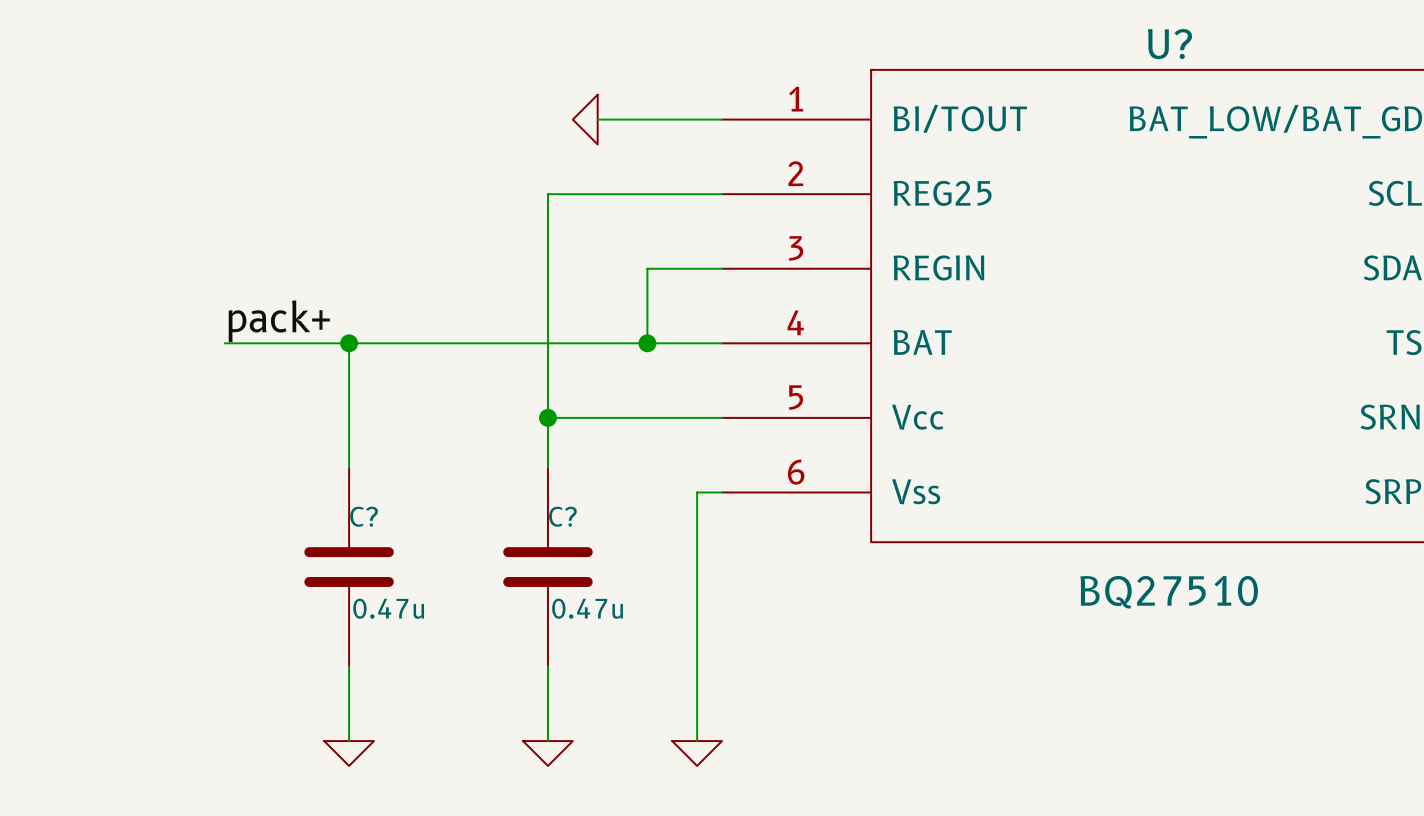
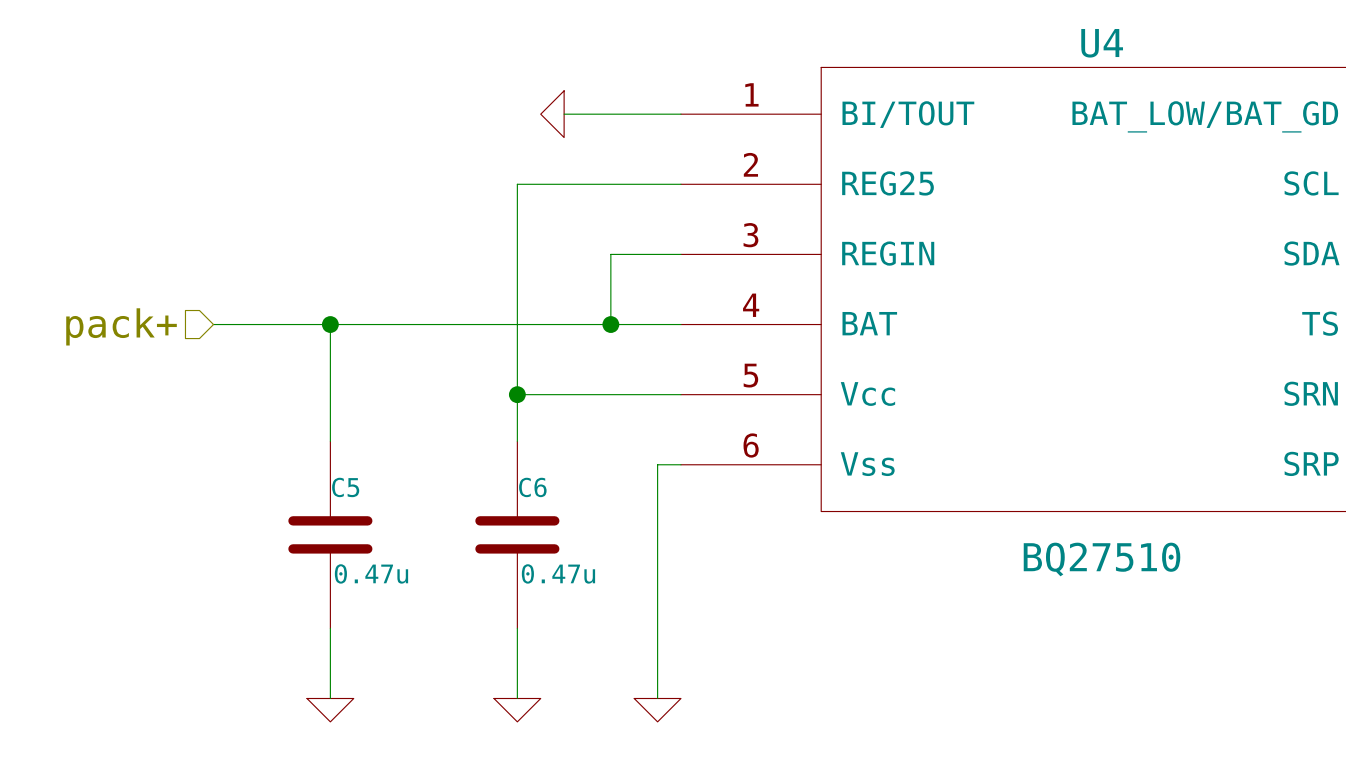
U? name: U? (1169, 44) -> U4 (1102, 43)
label: pack+ (279, 321) -> none
hierarchical label: none -> pack+ (121, 326)
C? name: C? (364, 516) -> C5 (345, 487)
C? name: C? (562, 516) -> C6 (532, 487)

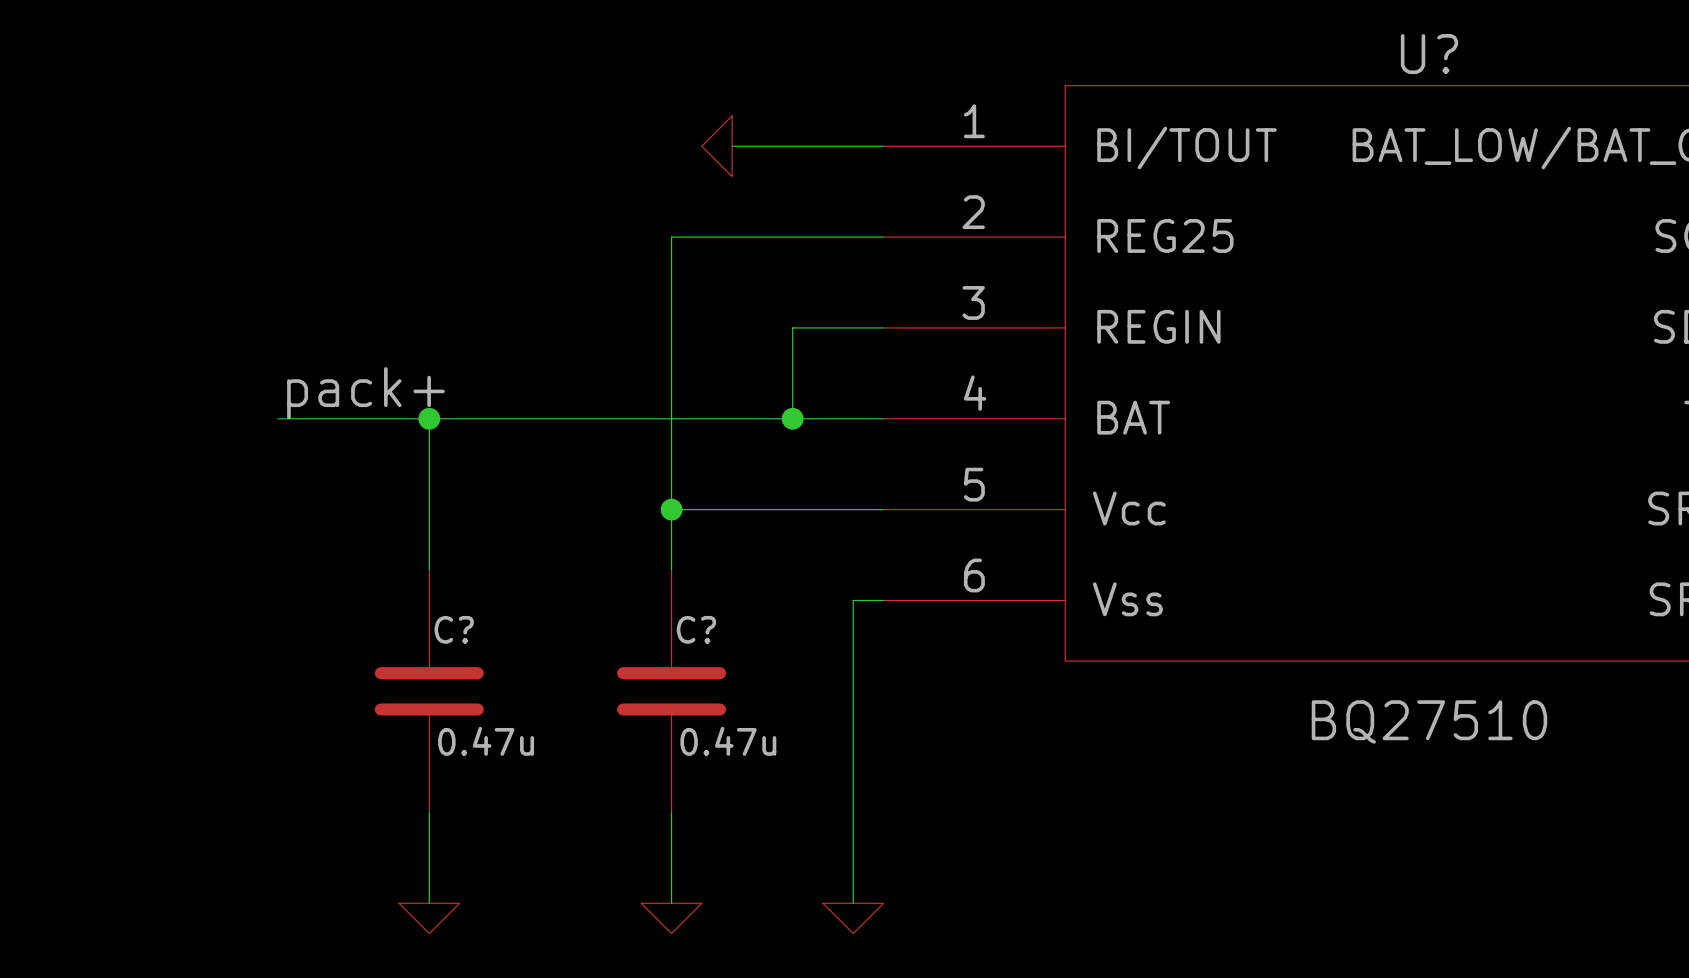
U4 name: U4 (1102, 43) -> U? (1429, 54)
label: none -> pack+ (365, 393)
hierarchical label: pack+ (121, 326) -> none
C5 name: C5 (345, 487) -> C? (454, 629)
C6 name: C6 (532, 487) -> C? (696, 629)

